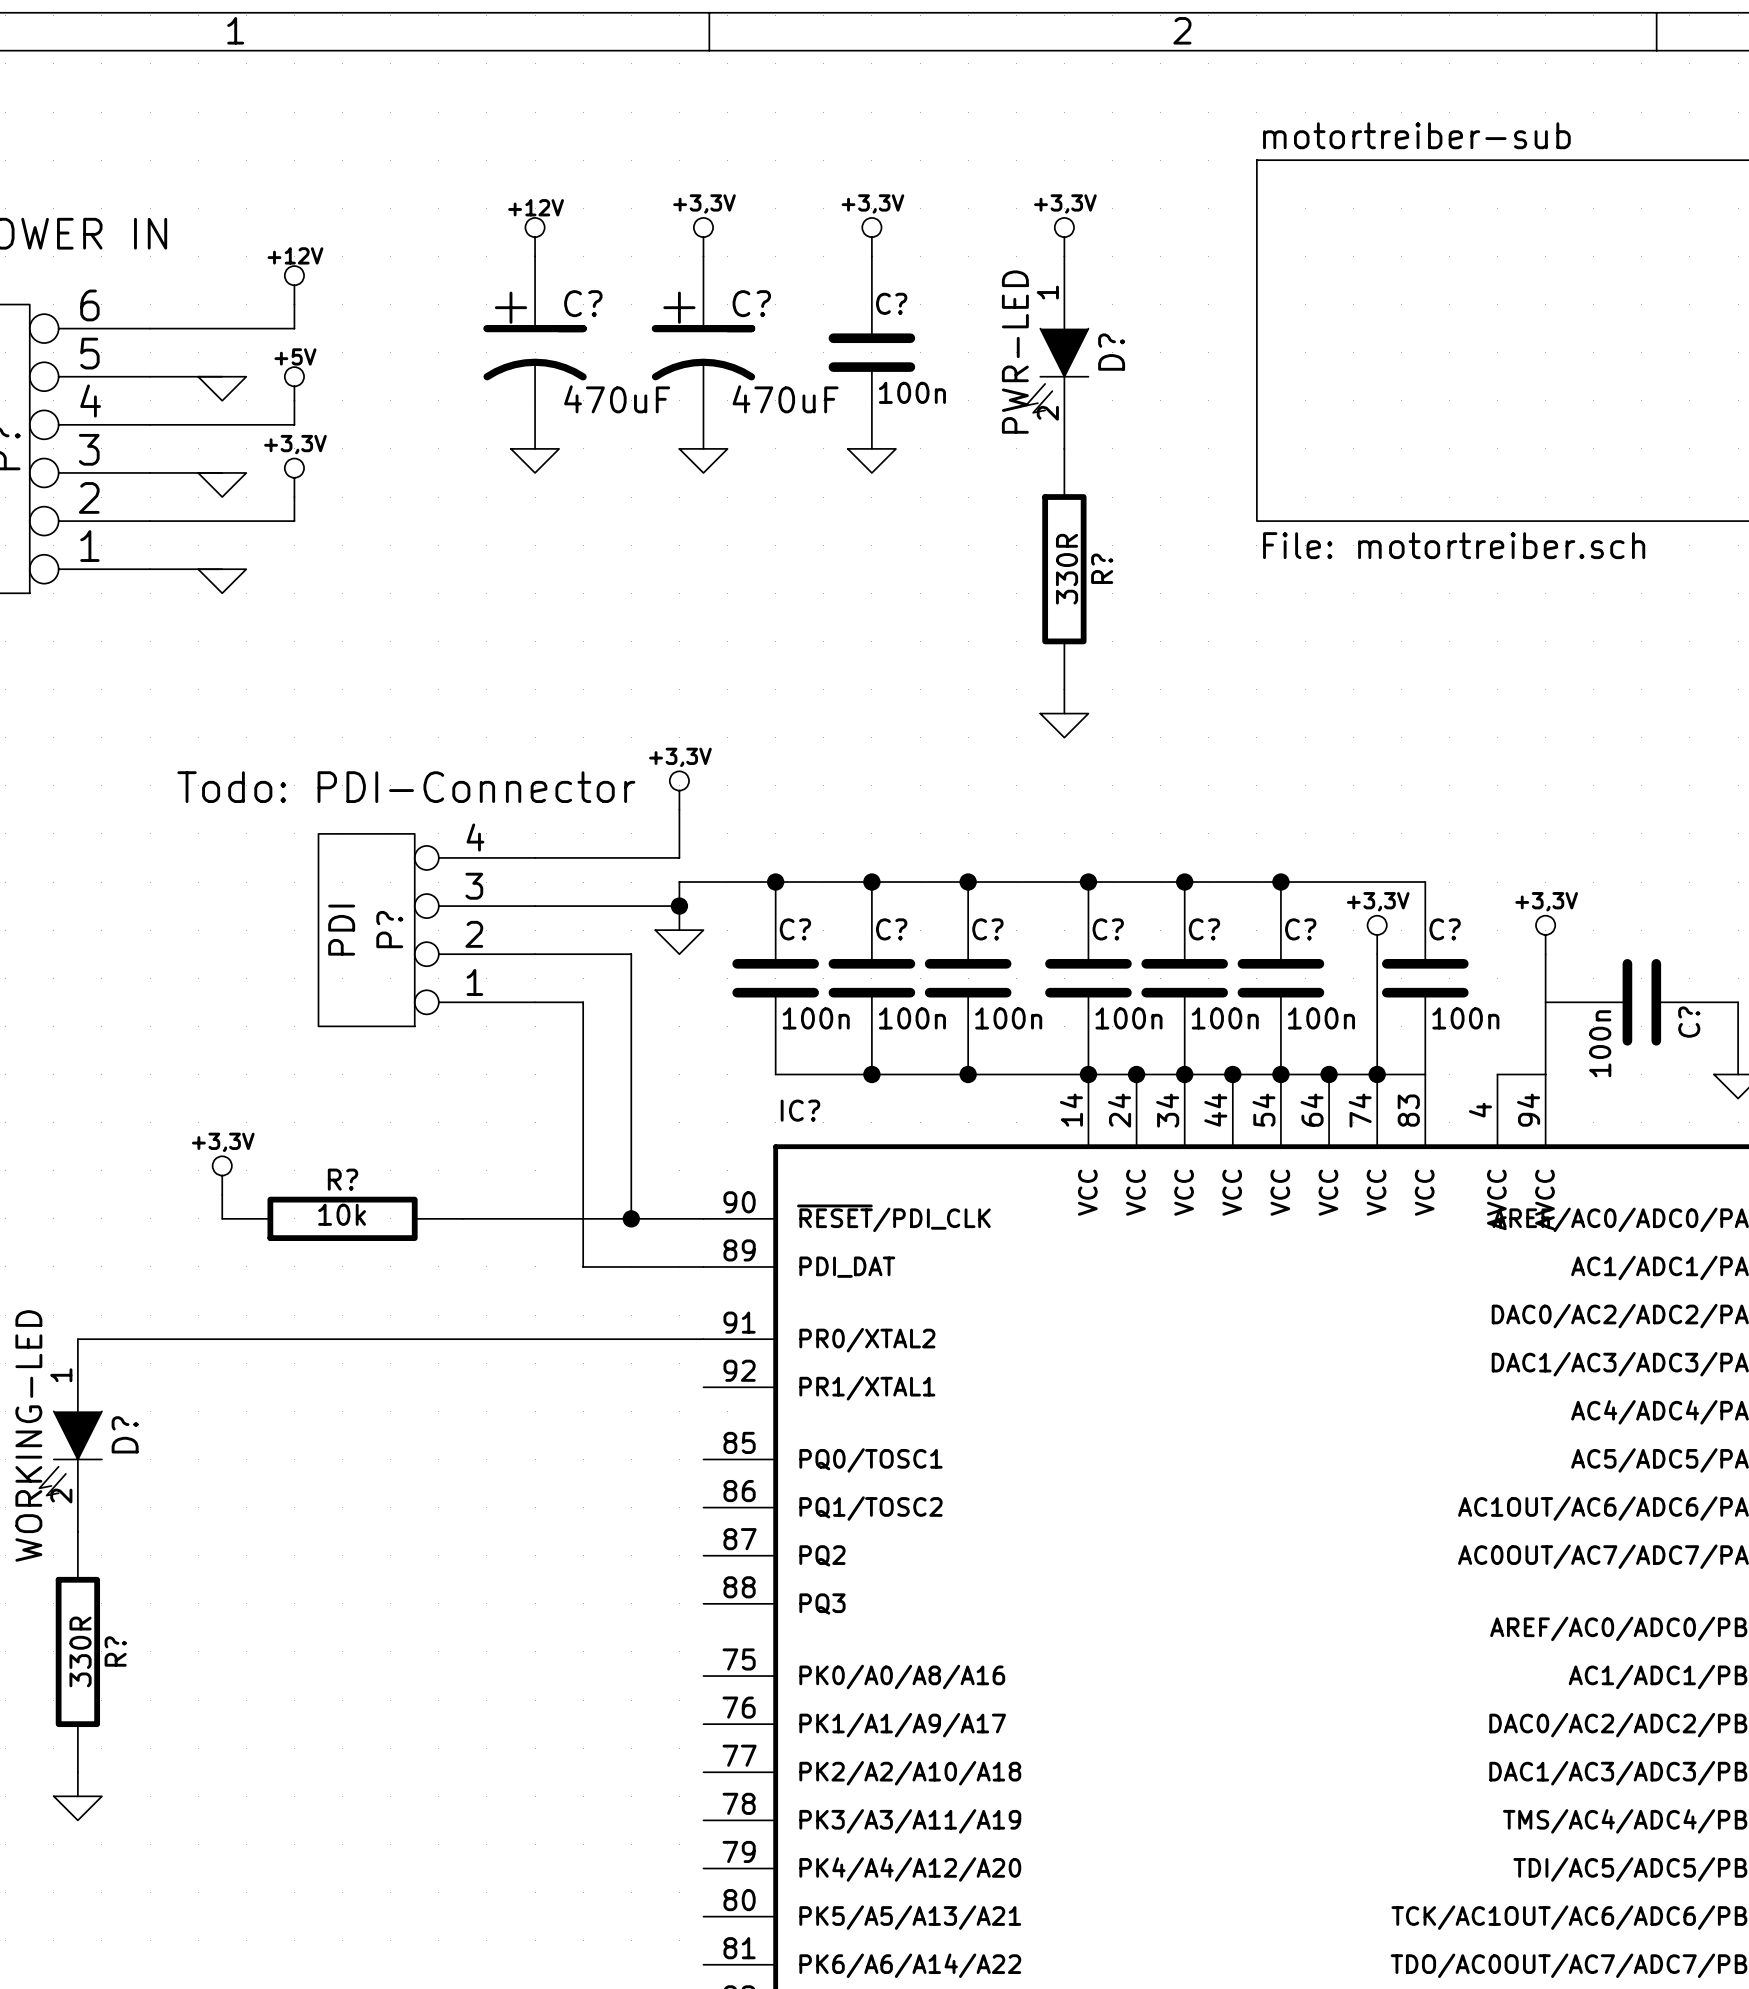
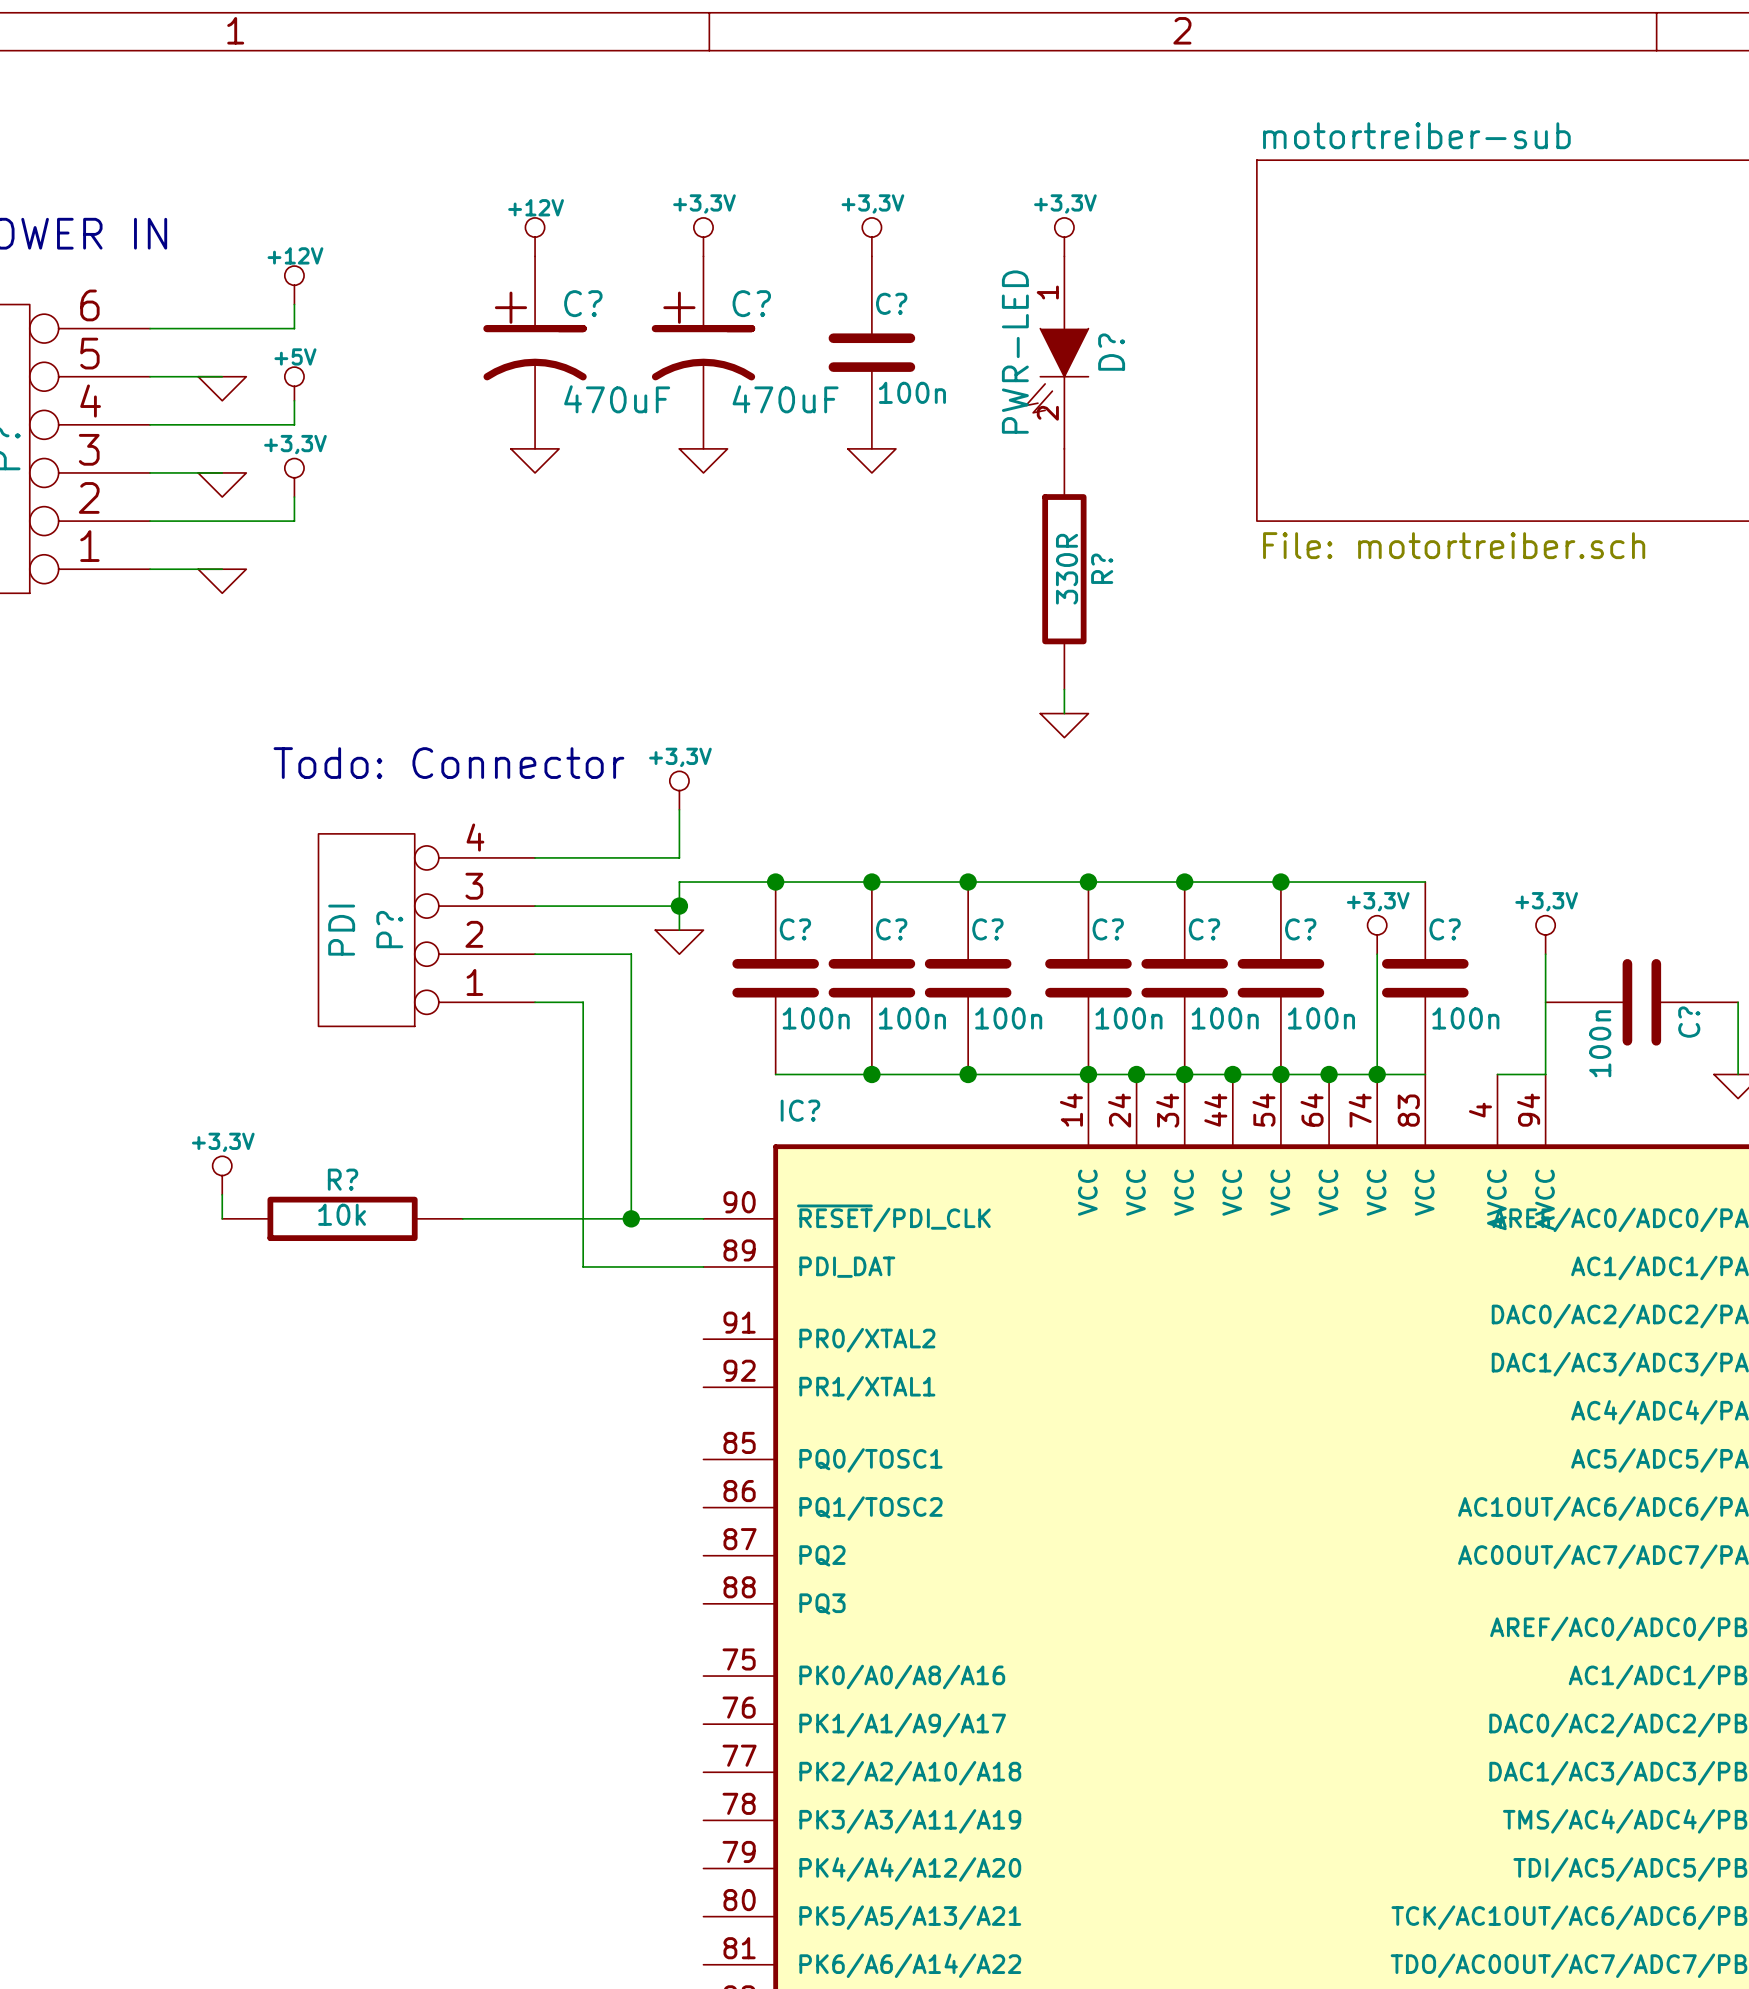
text: Todo: PDI-Connector (406, 787) -> Todo: Connector (448, 763)
wire: (77, 1339) (703, 1339) -> none
D?: WORKING-LED (70, 1435) -> none
R?: 330R (77, 1651) -> none
wire: (77, 1772) (77, 1796) -> none
power symbol: (77, 1808) -> none

